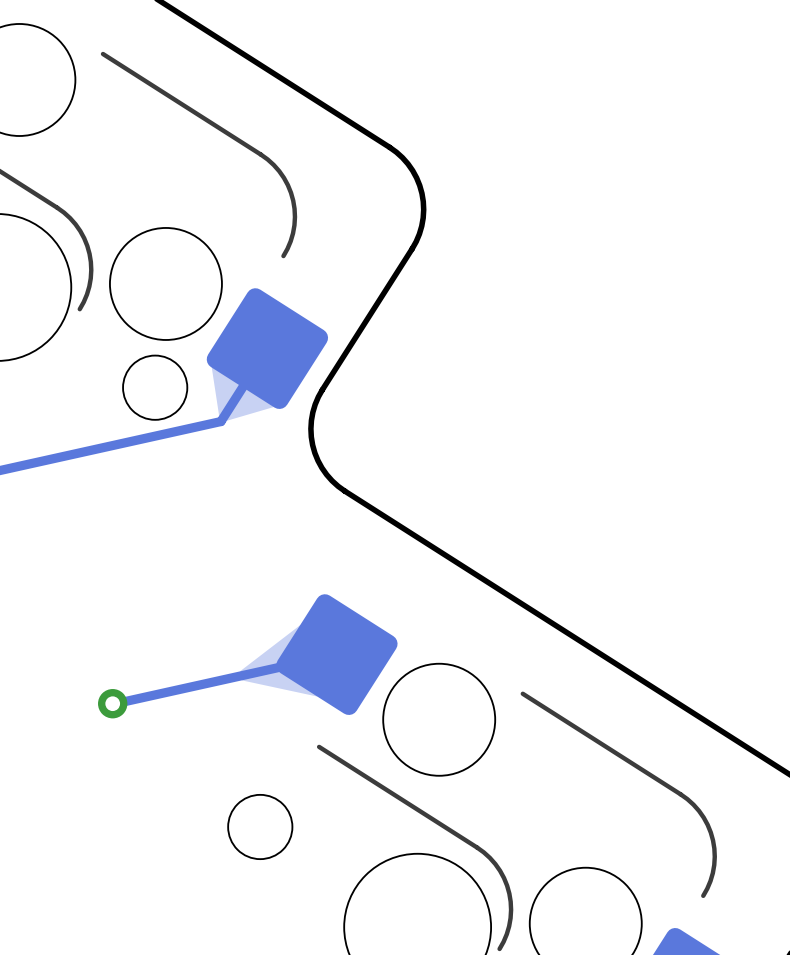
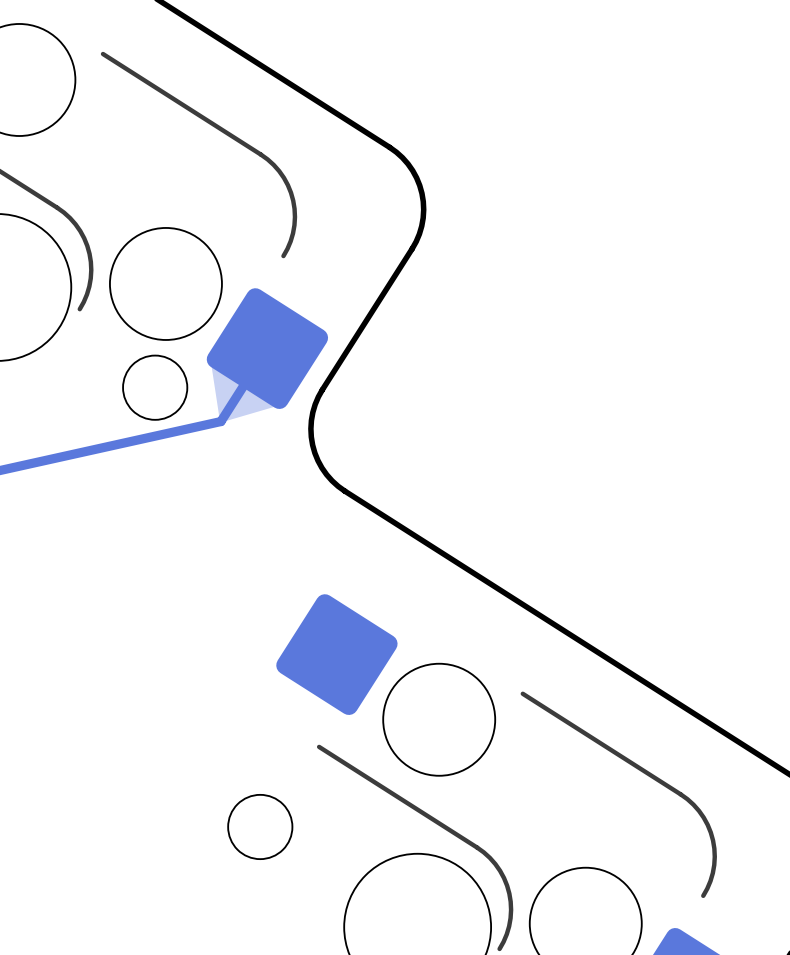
track: (336, 654) (112, 703) -> none
via: (112, 703) -> none

